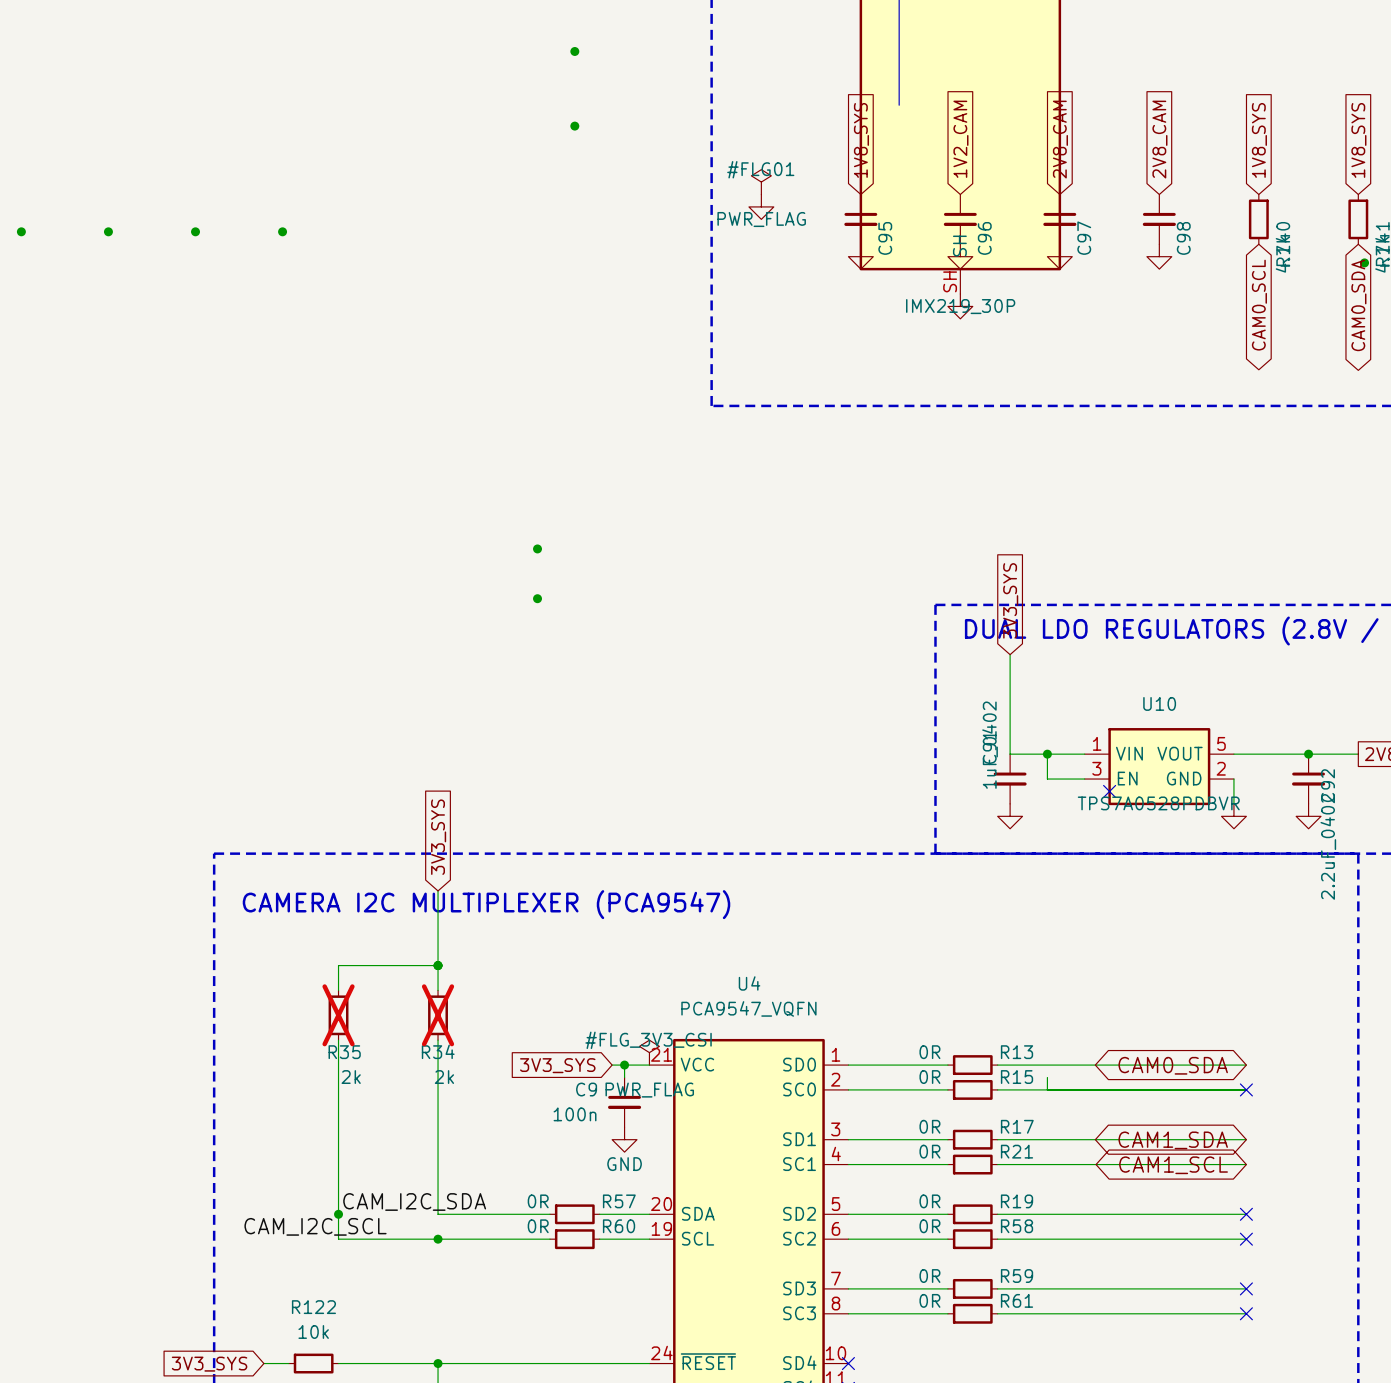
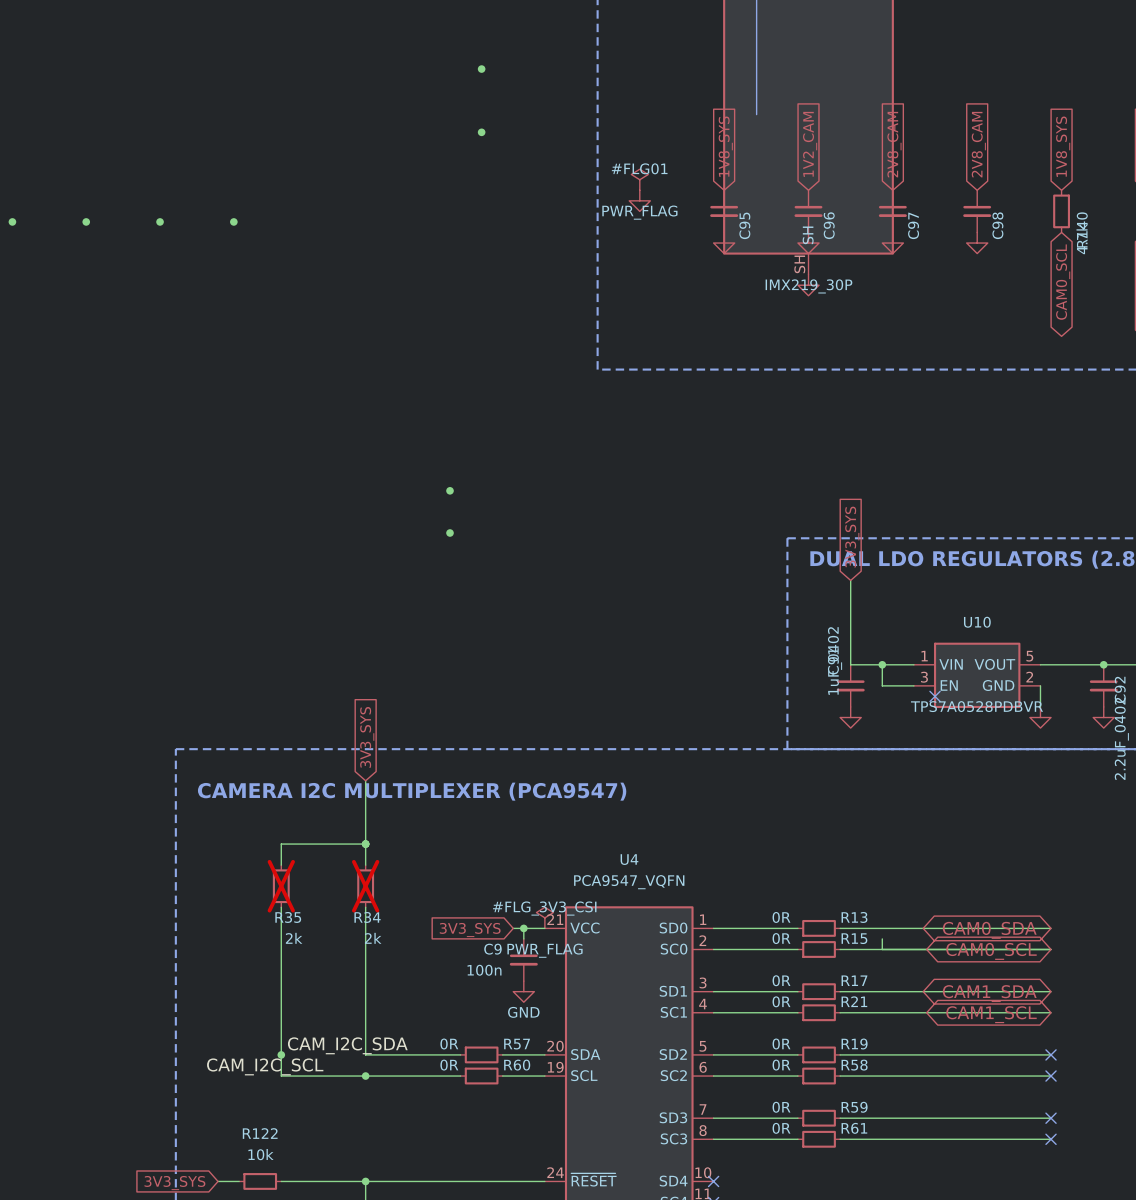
no-connect mark: (1246, 1089) -> none
global label: none -> CAM0_SCL (991, 951)

